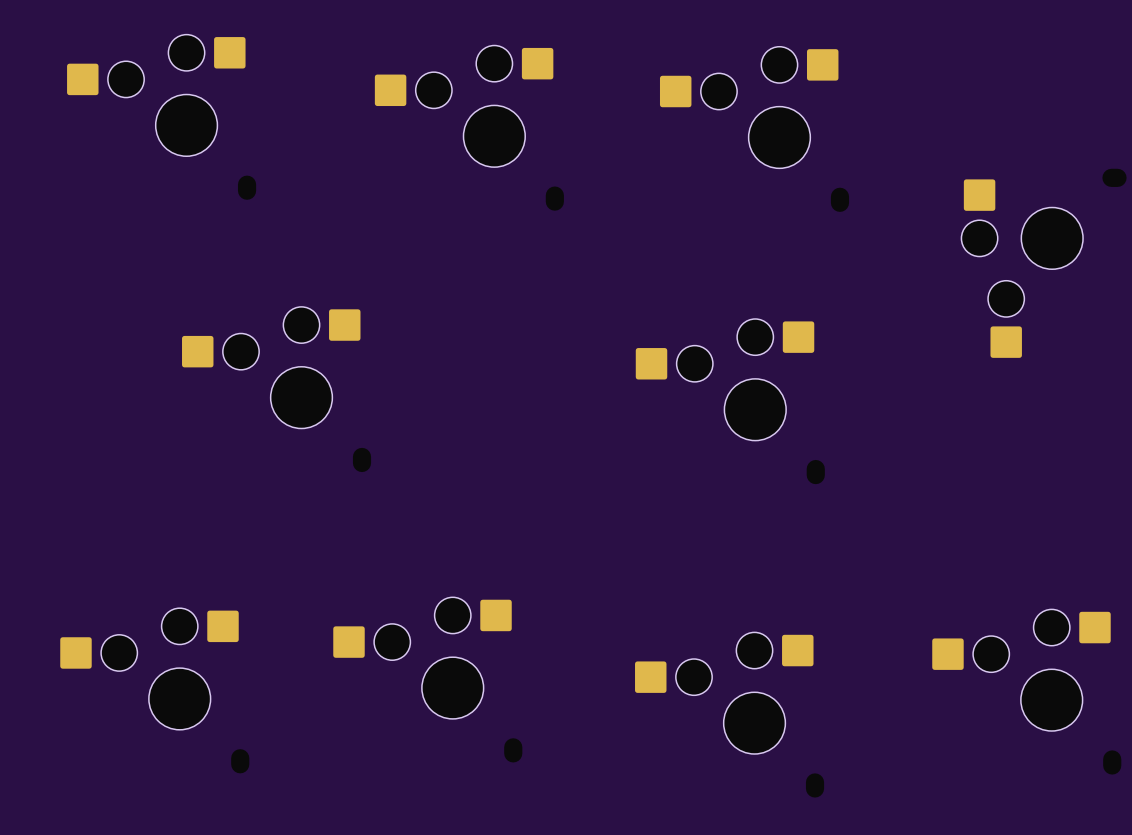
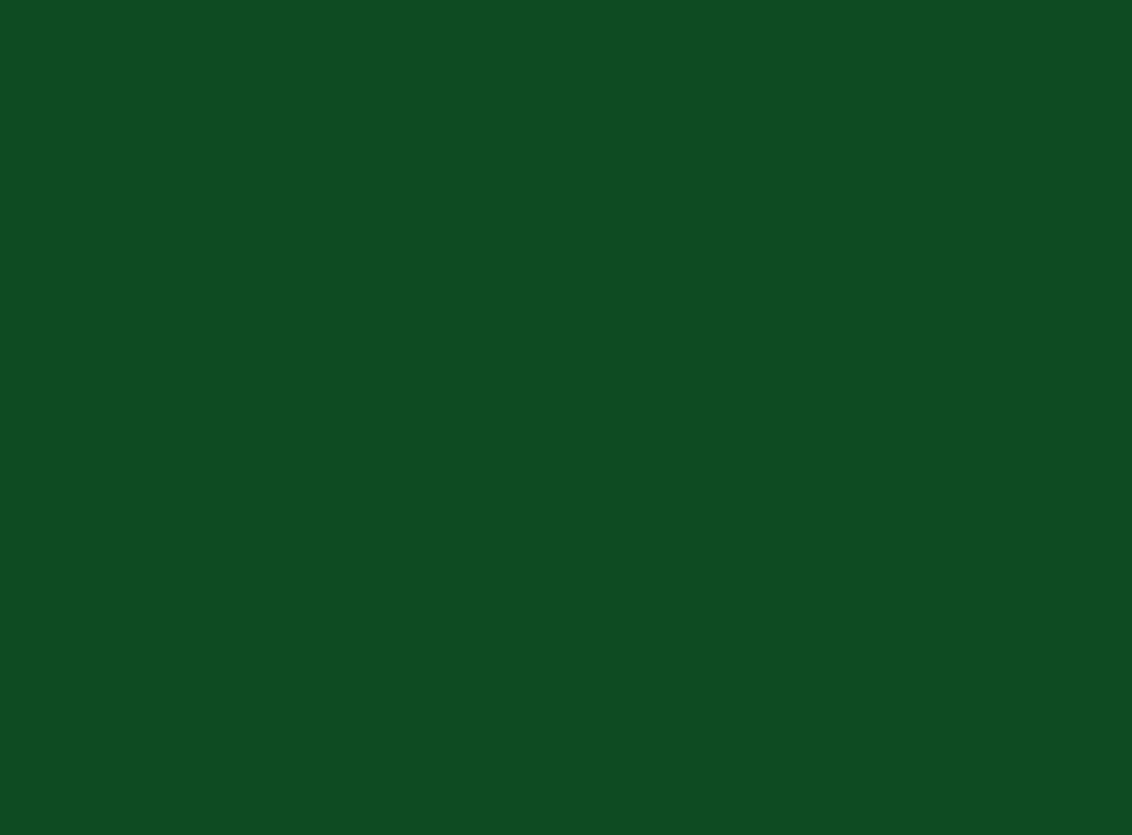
part: (161, 117) -> none
part: (469, 128) -> none
part: (754, 129) -> none
part: (1044, 263) -> none
part: (276, 389) -> none
part: (730, 401) -> none
part: (427, 679) -> none
part: (154, 690) -> none
part: (1026, 691) -> none
part: (729, 714) -> none

